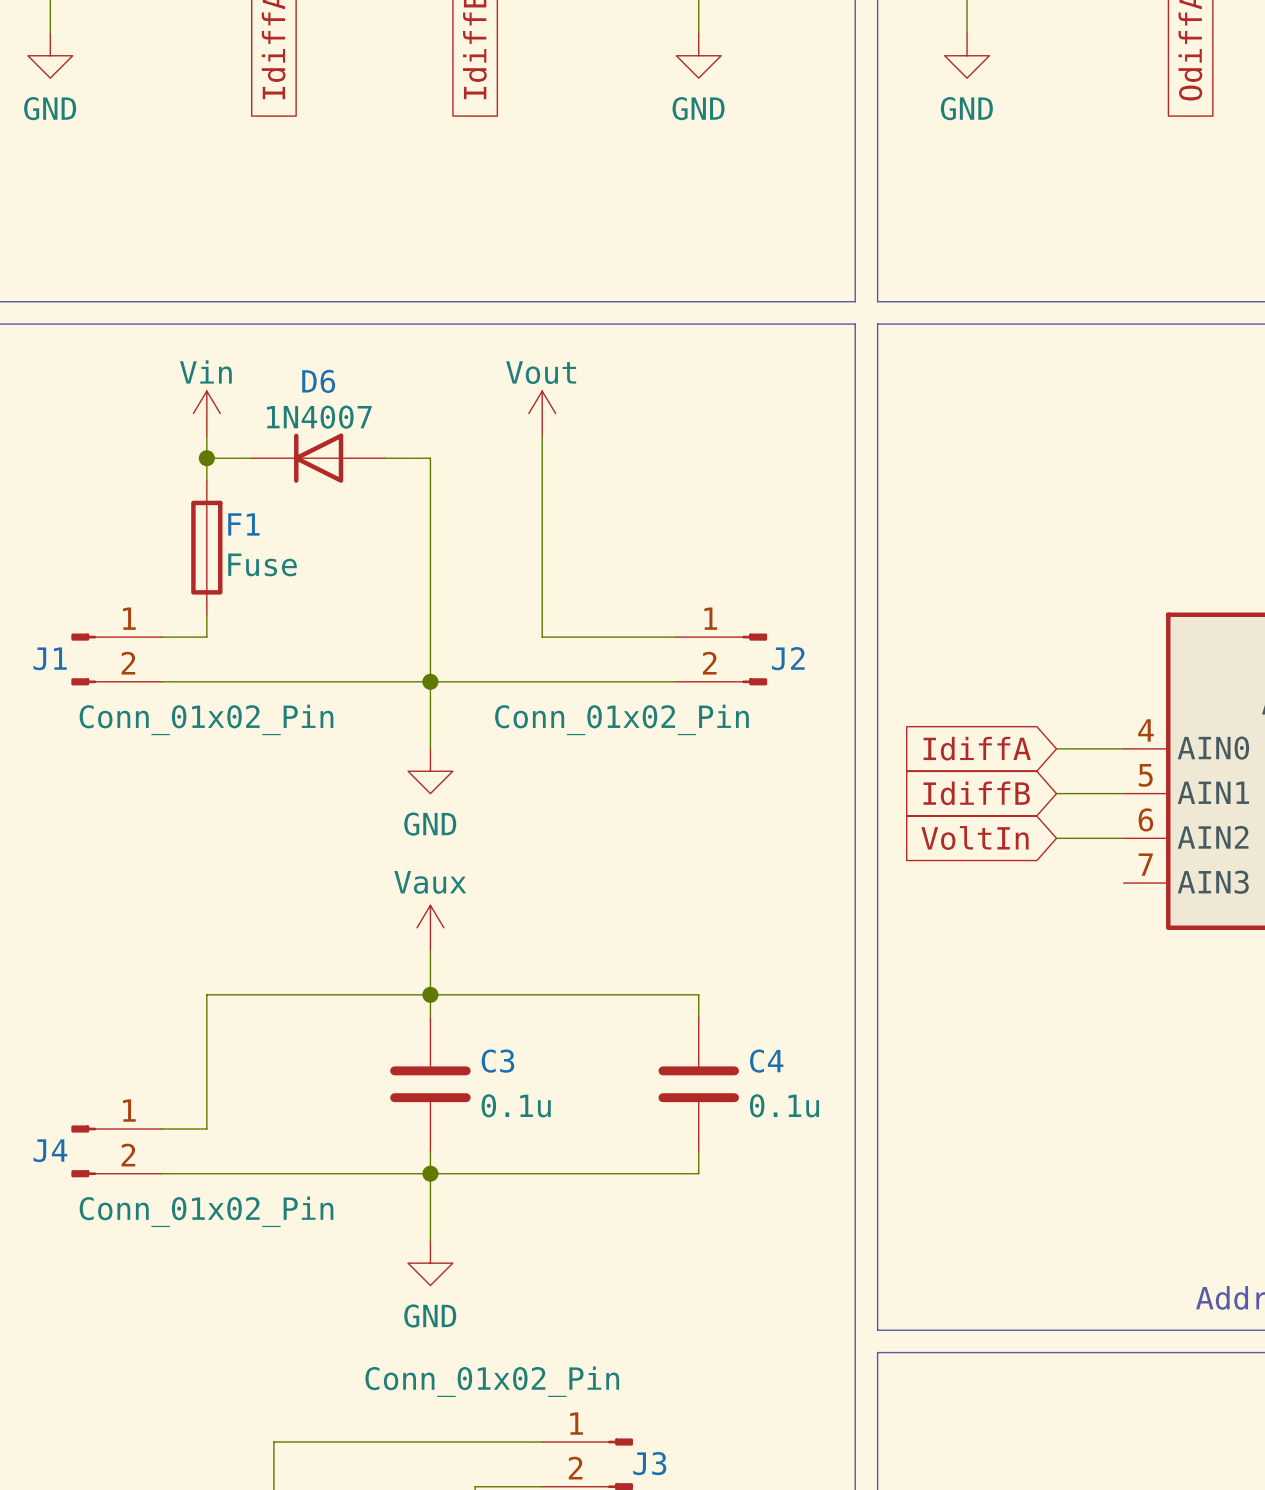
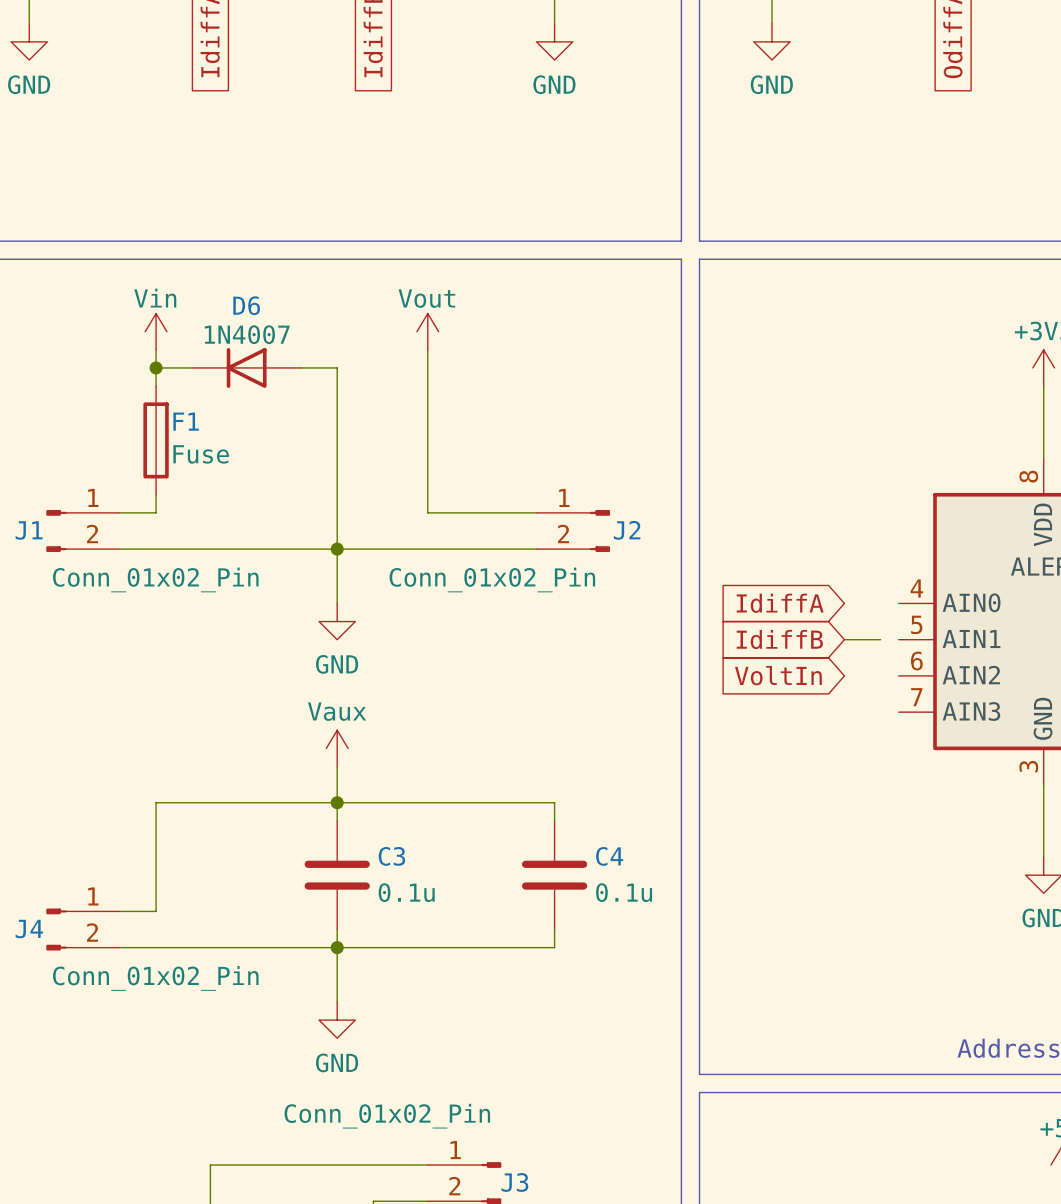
wire: (1056, 748) (1123, 748) -> none
wire: (1101, 793) (1123, 793) -> none
wire: (1056, 838) (1123, 838) -> none

